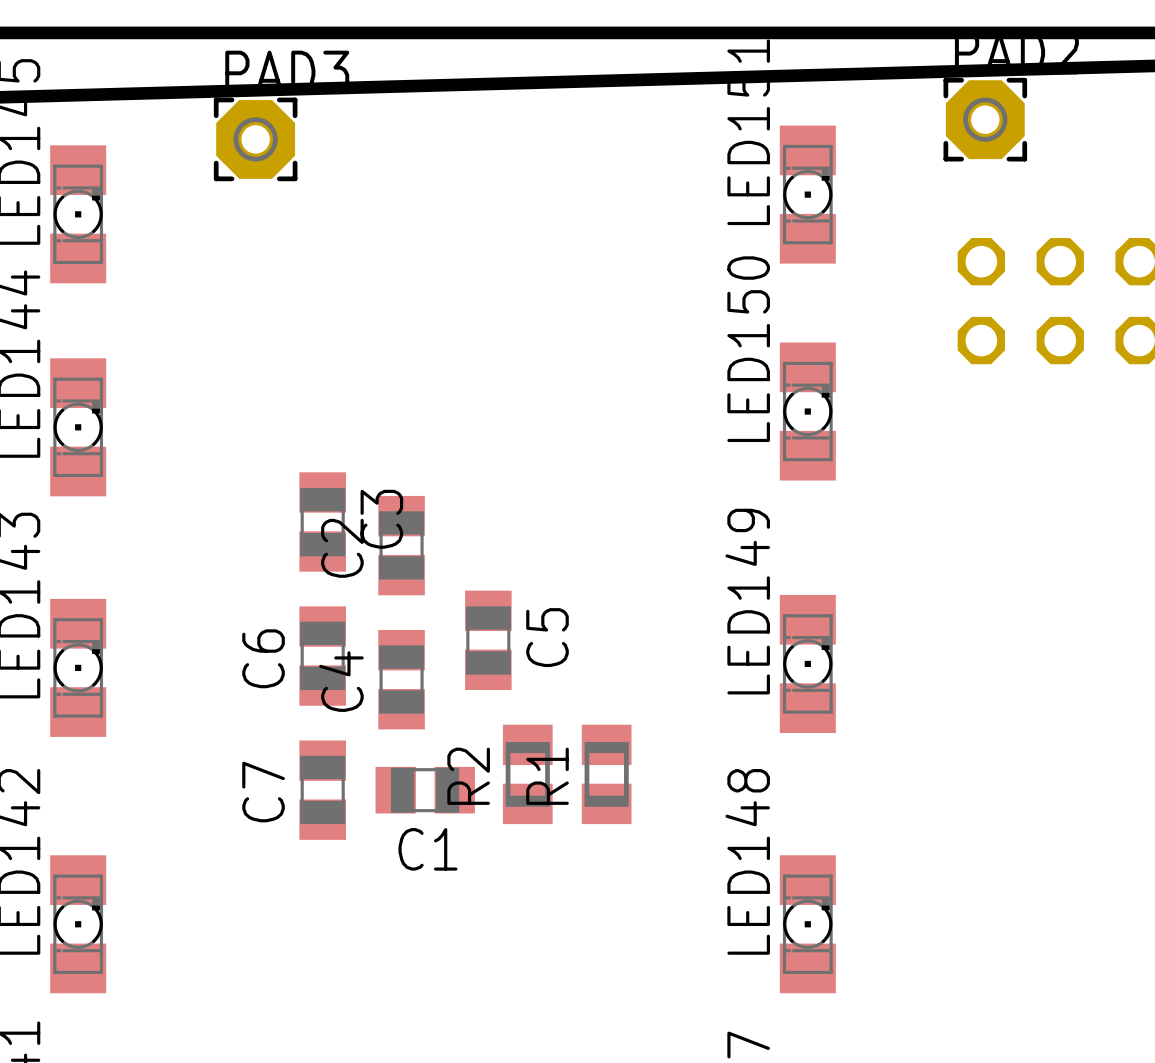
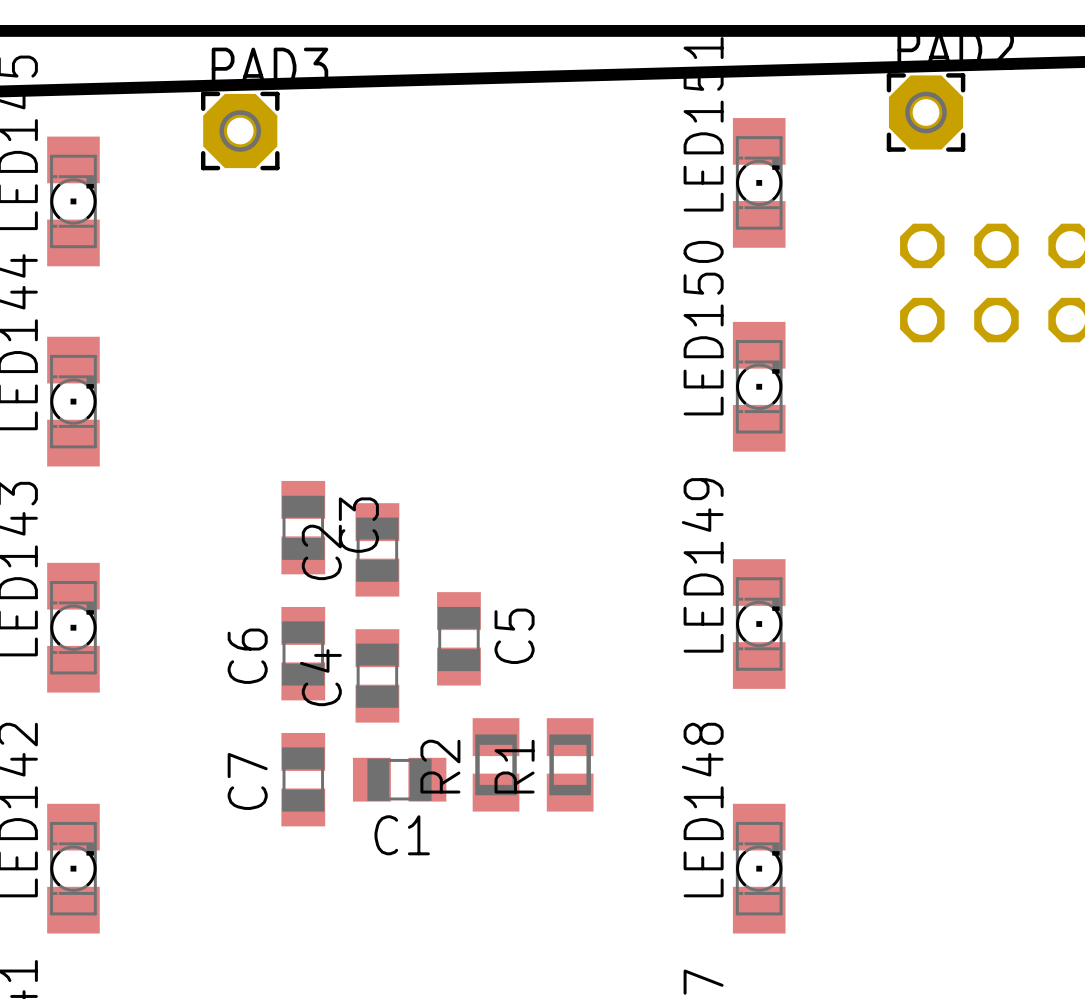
C3 position: (322, 521) -> (303, 527)
C2 position: (401, 545) -> (377, 549)
C5 position: (488, 640) -> (458, 638)
C6 position: (322, 656) -> (303, 653)
C4 position: (401, 679) -> (377, 675)
R2 position: (527, 774) -> (496, 764)
R1 position: (606, 774) -> (570, 764)
C7 position: (322, 790) -> (303, 779)
C1 position: (425, 790) -> (399, 779)

